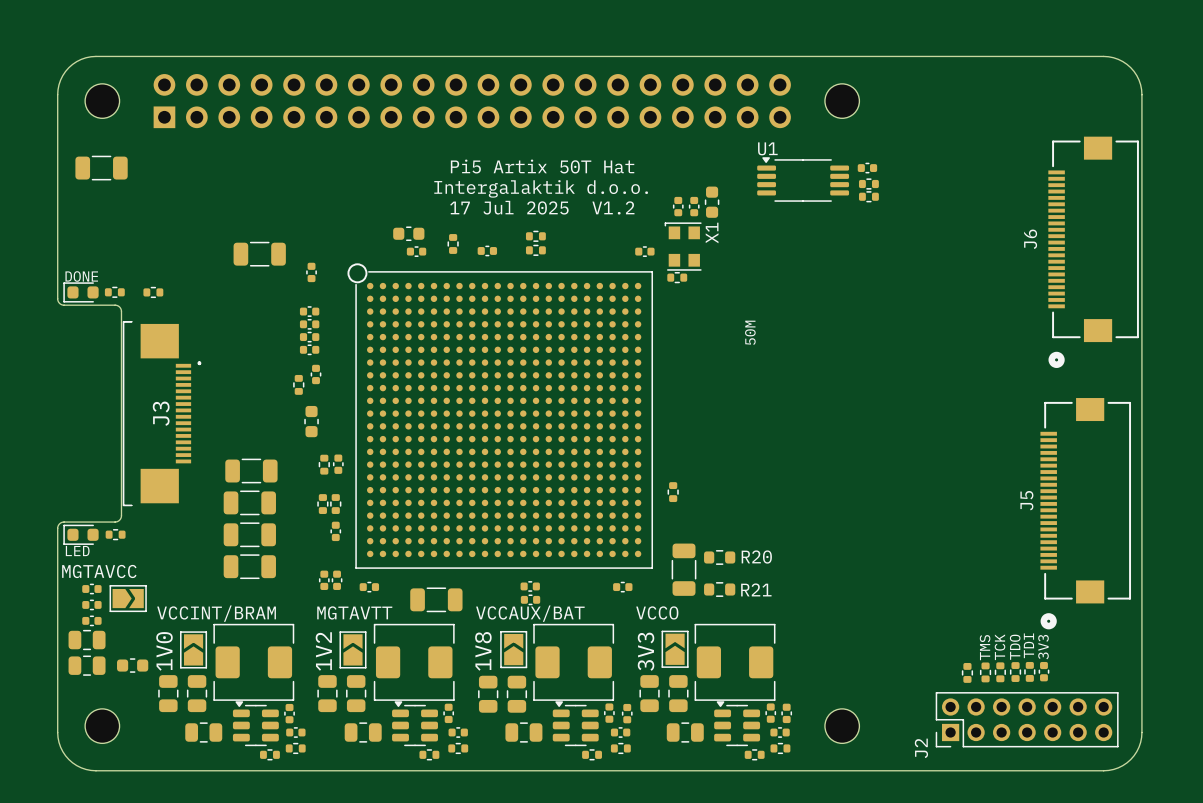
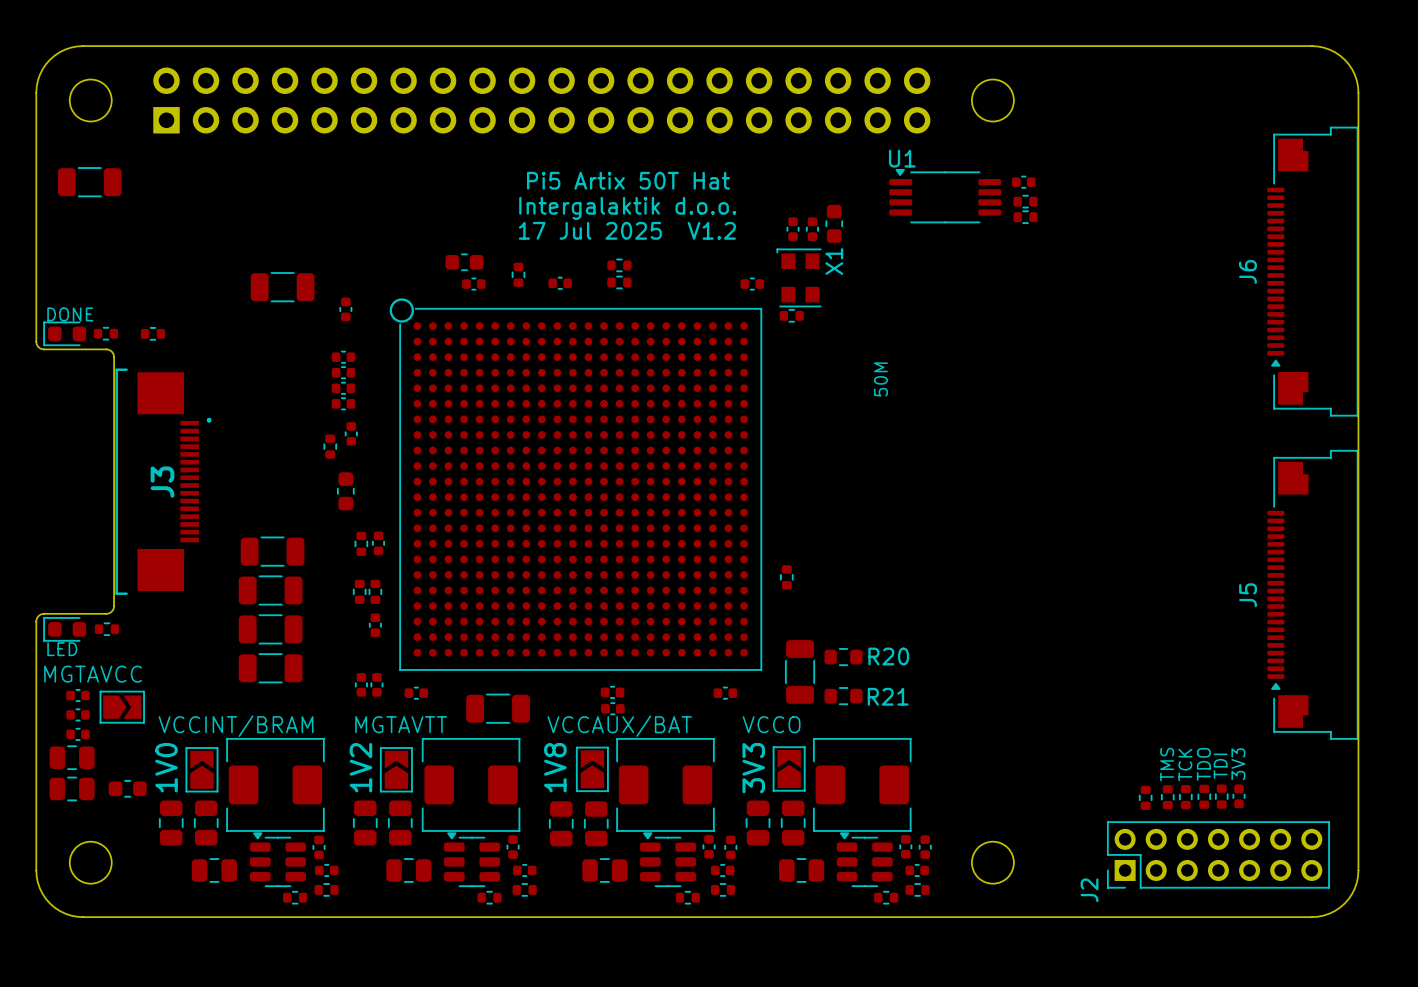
J6 footprint: [1048, 136, 1139, 368] -> [1267, 126, 1359, 417]
J5 footprint: [1040, 398, 1132, 630] -> [1267, 449, 1359, 740]

